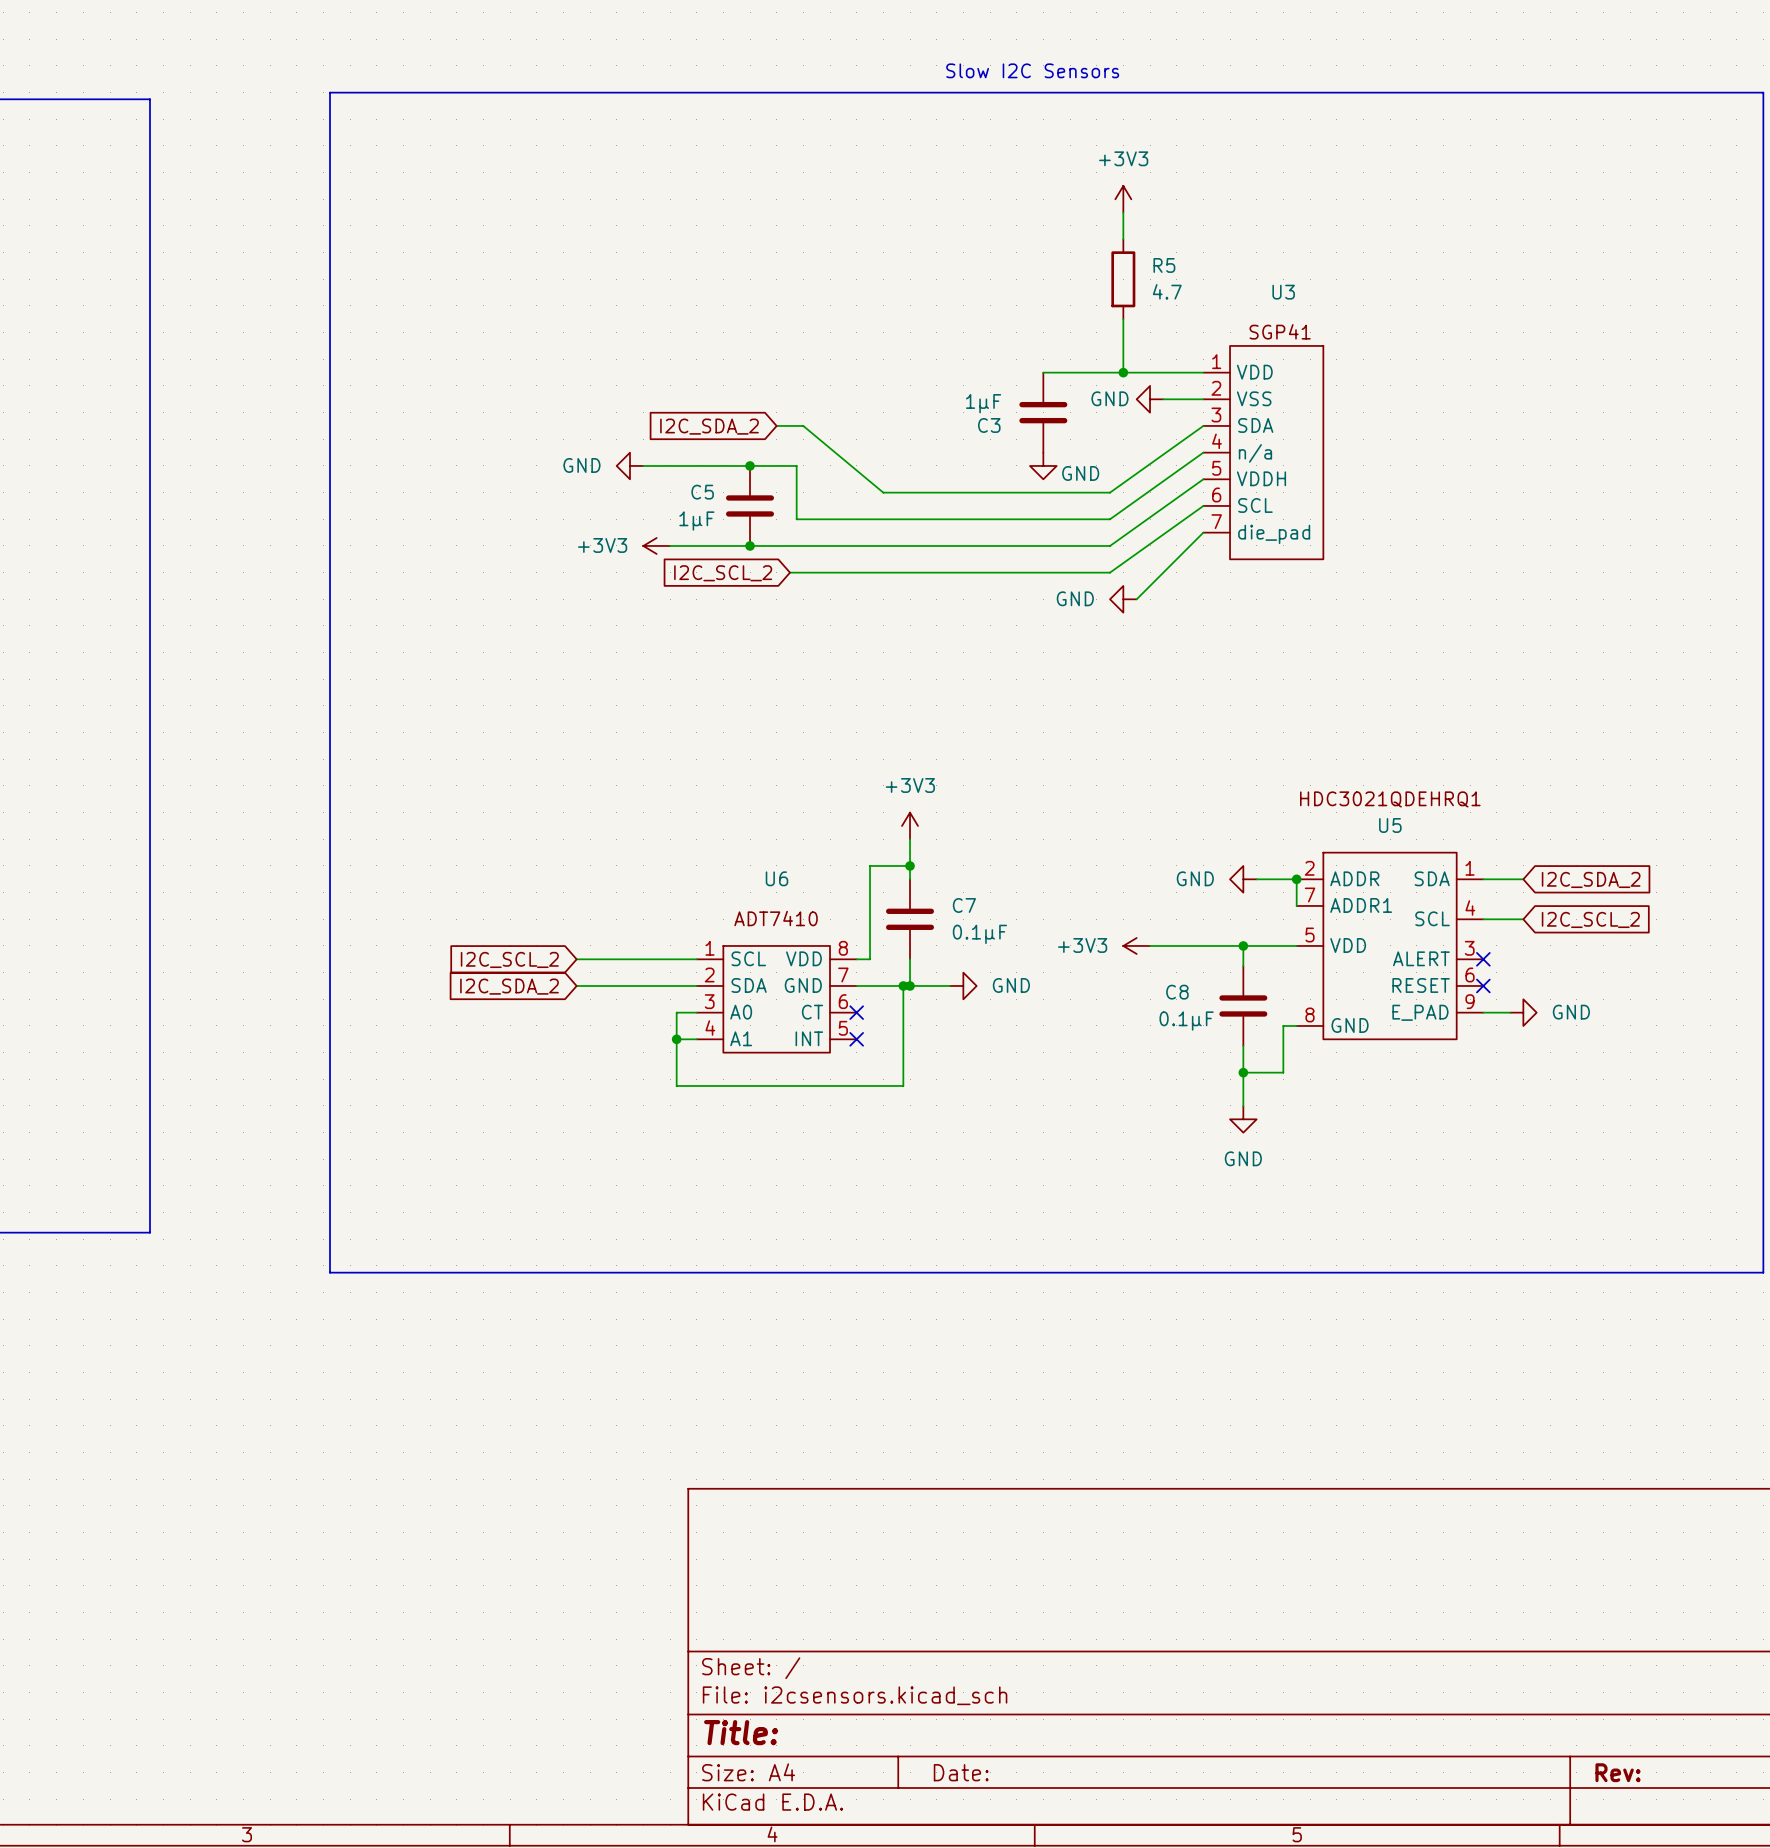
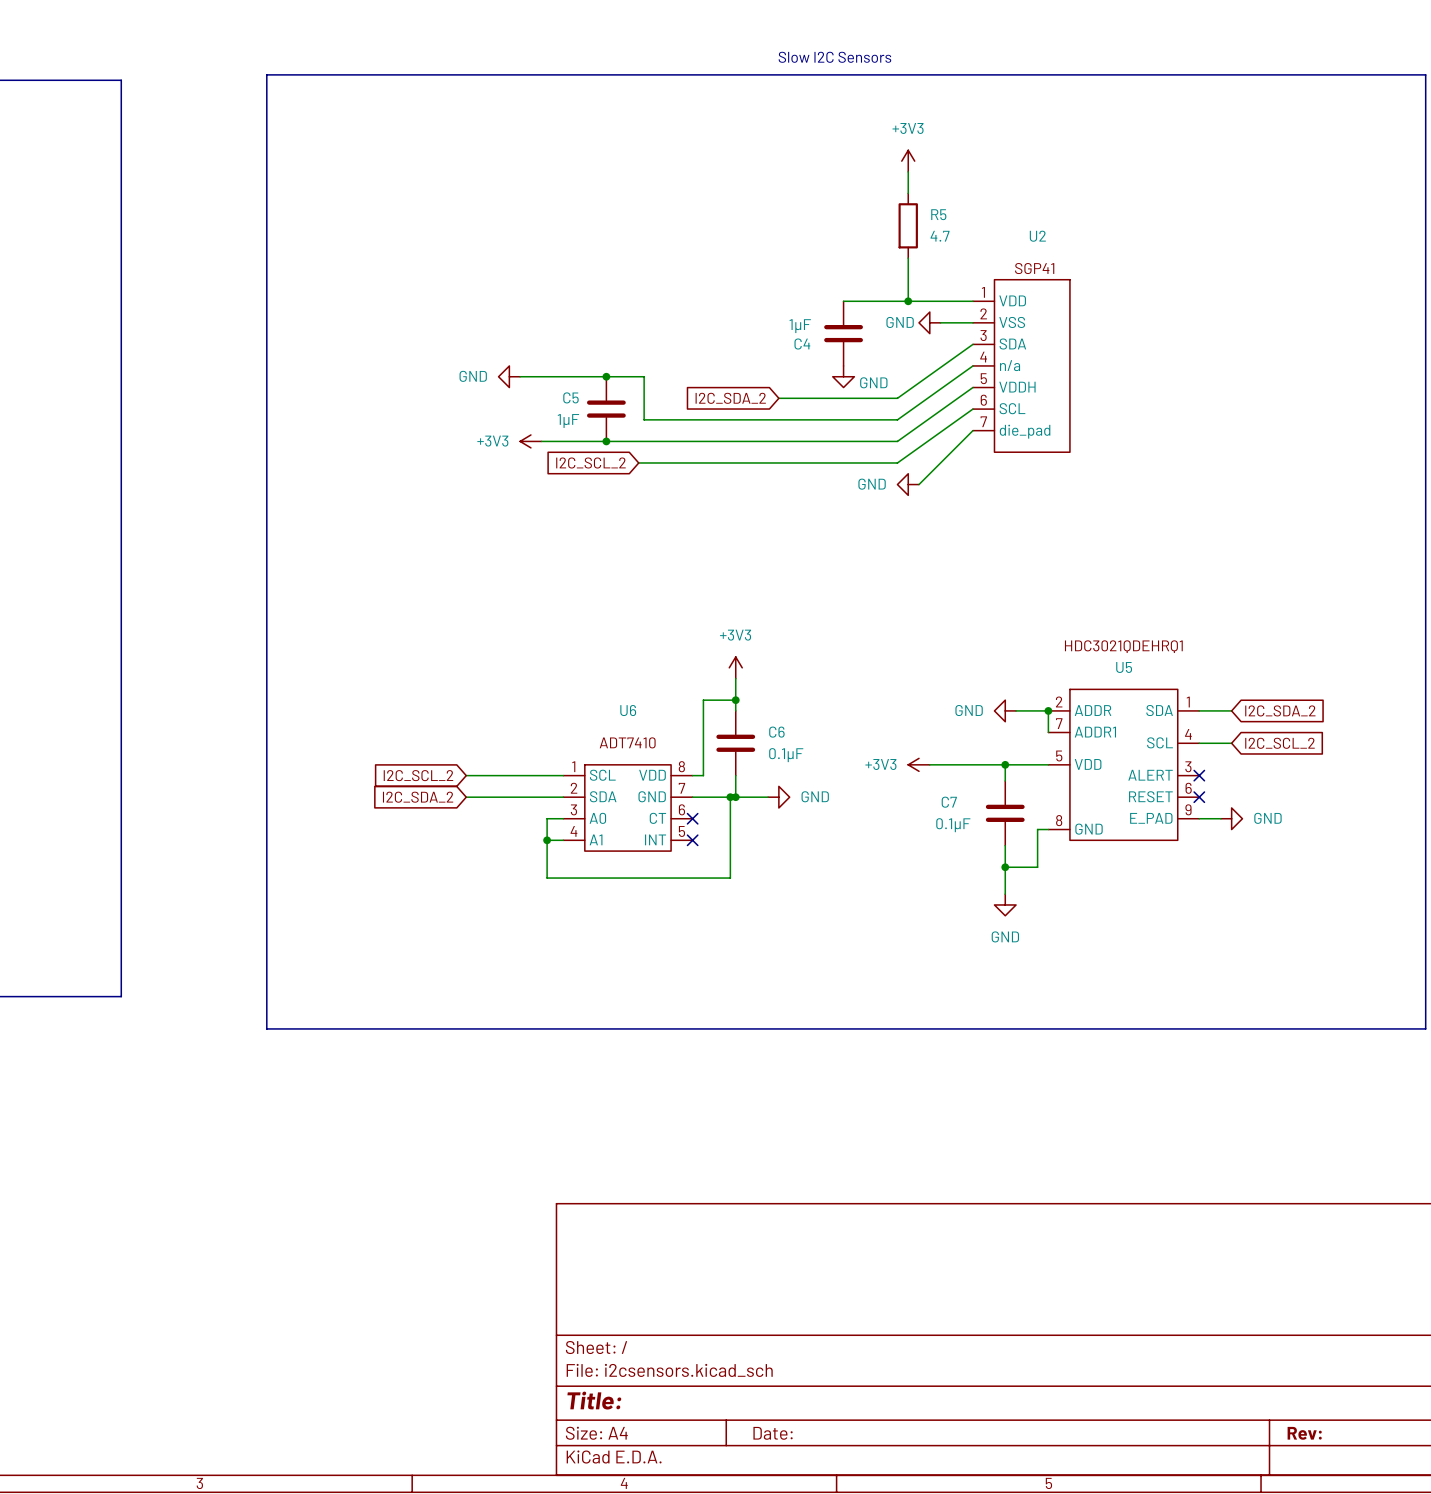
U3 name: U3 (1283, 292) -> U2 (1037, 236)
wire: (776, 425) (803, 425) (883, 492) (963, 492) -> none
C3 name: C3 (989, 425) -> C4 (802, 344)
global label position: I2C_SDA_2 (709, 426) -> I2C_SDA_2 (730, 398)
C7 name: C7 (964, 905) -> C6 (776, 732)
C8 name: C8 (1177, 992) -> C7 (949, 802)

